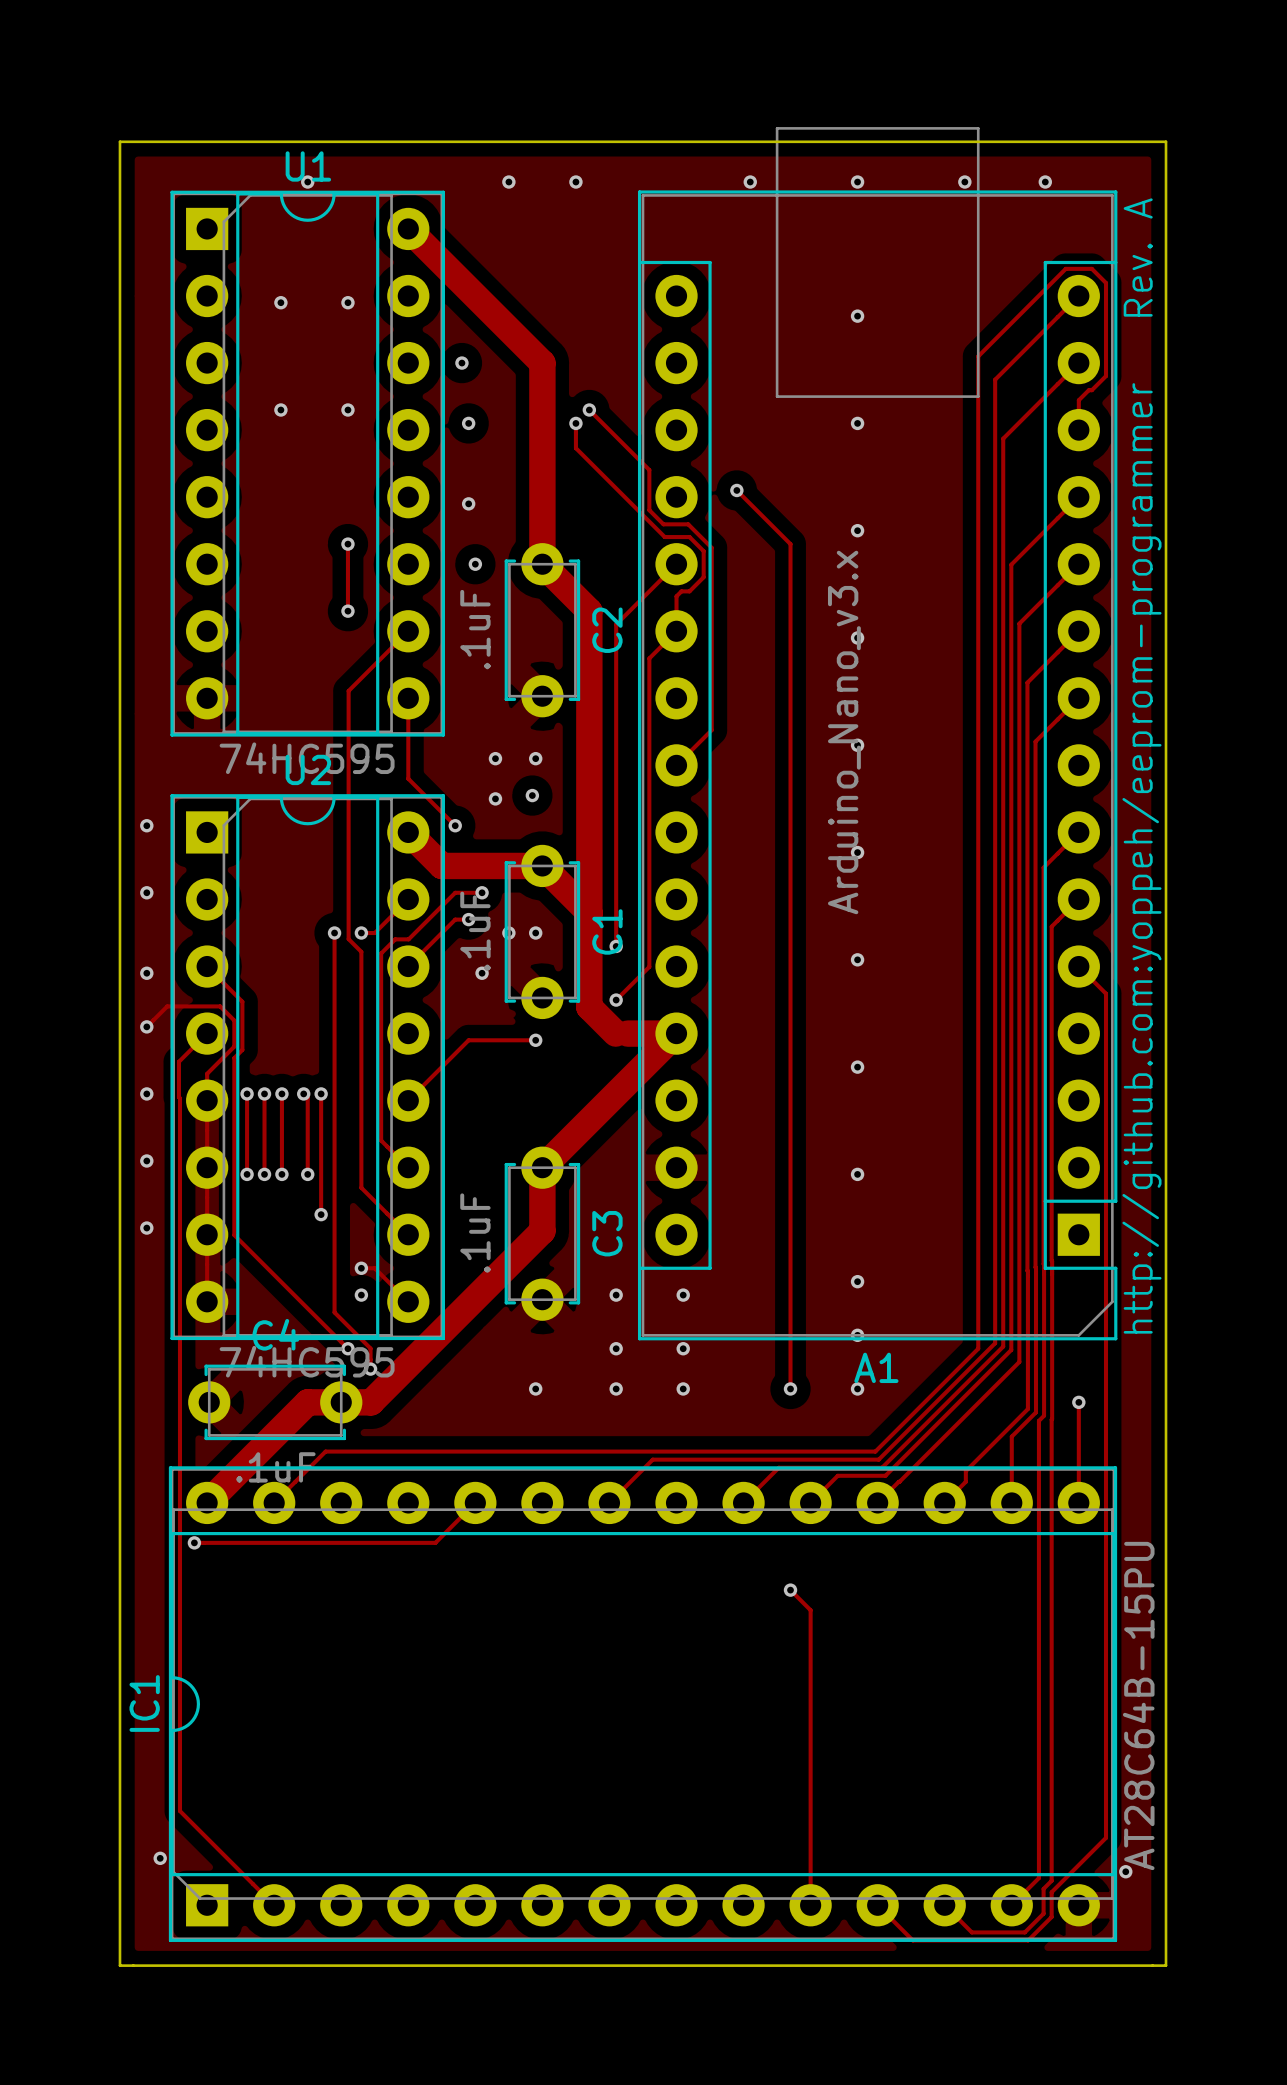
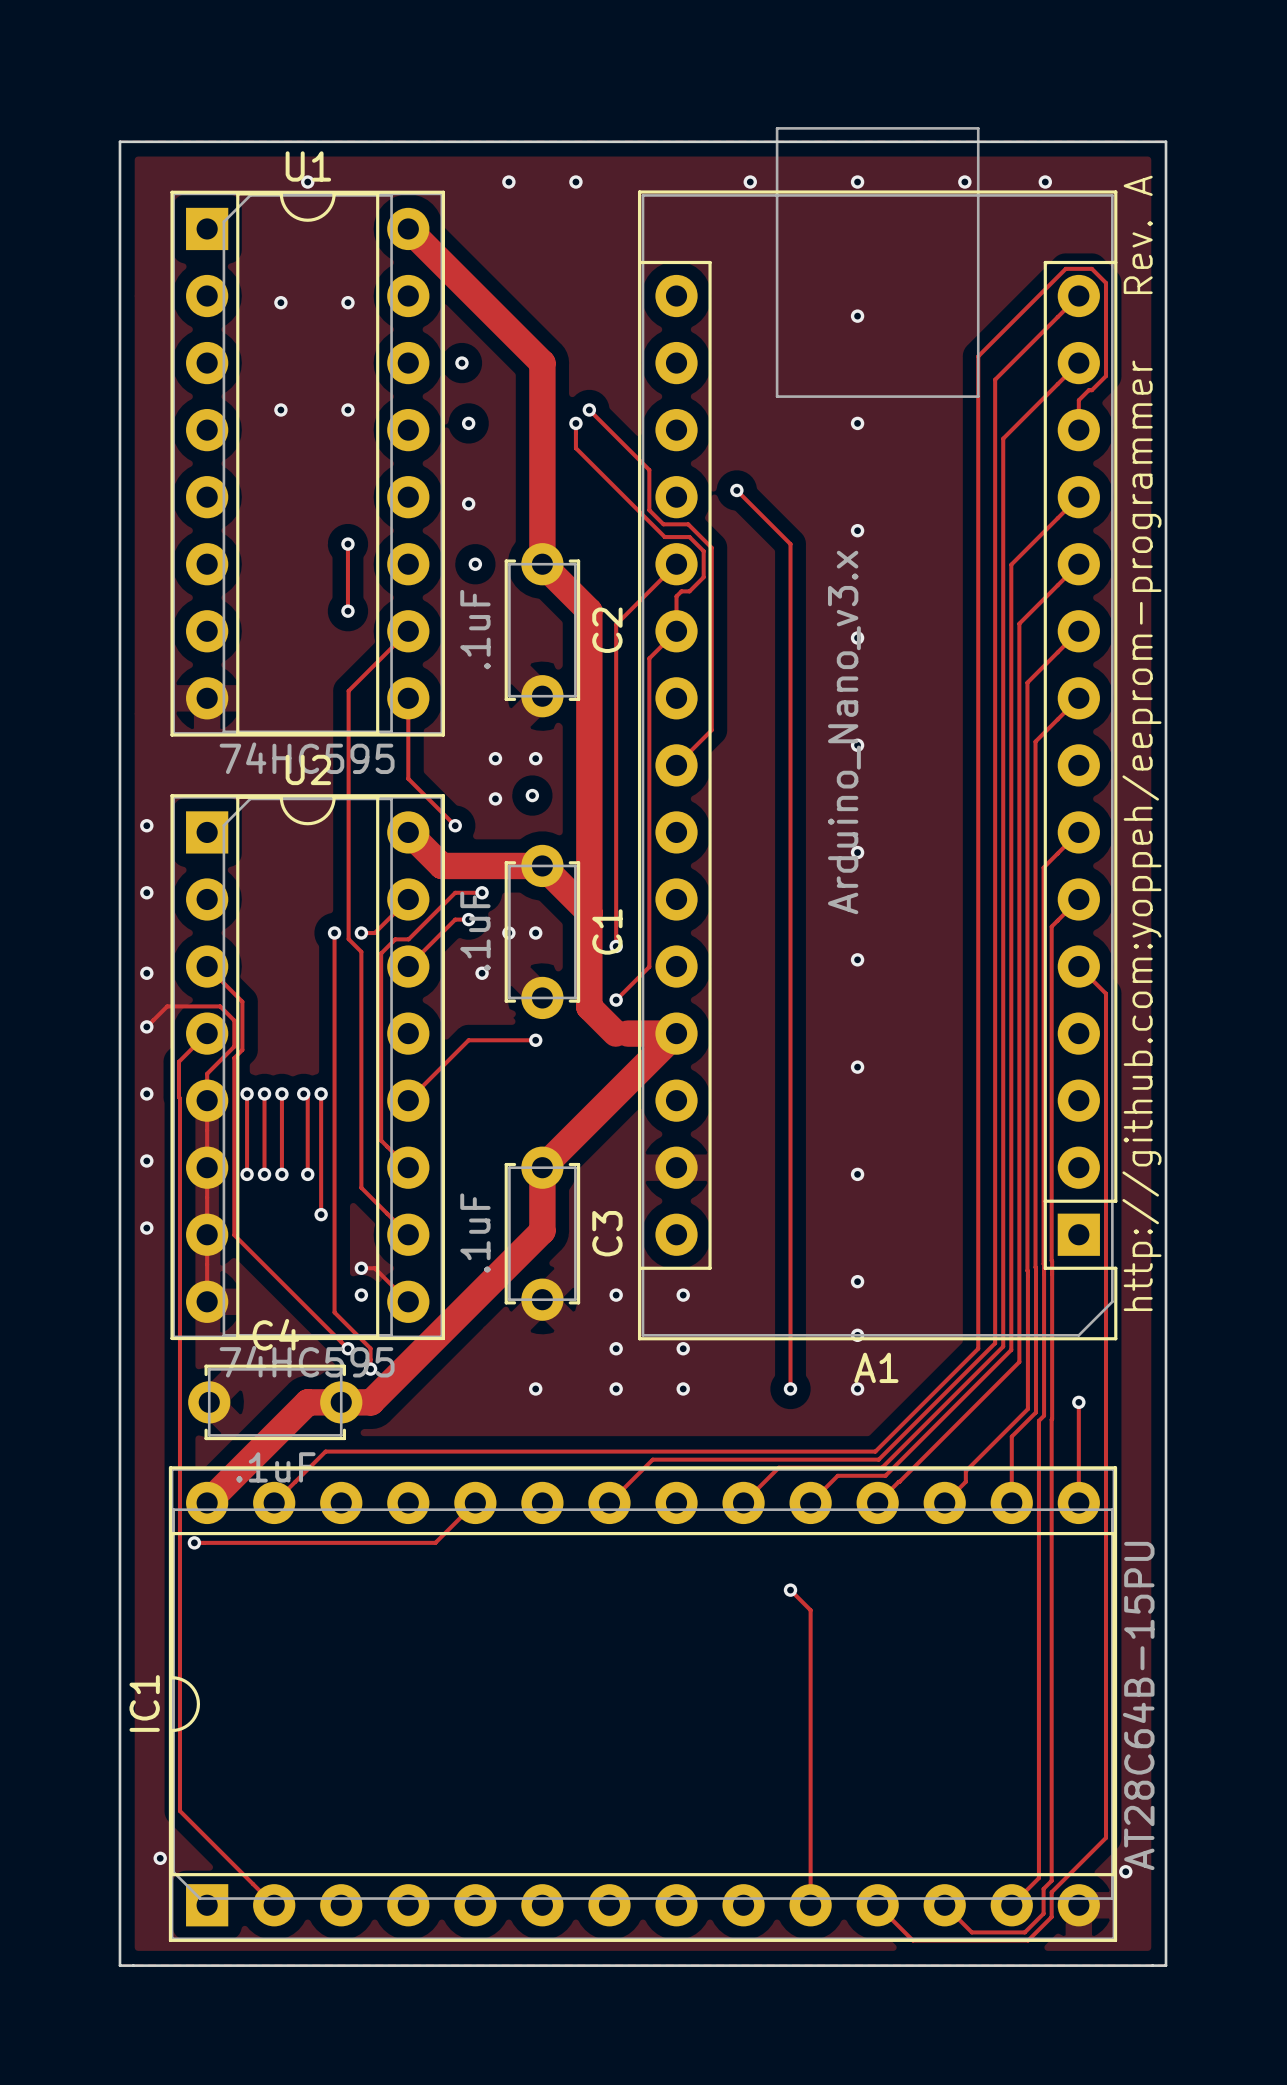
text position: http://github.com:yoppeh/eeprom-programmer Rev. A (1141, 766) -> http://github.com:yoppeh/eeprom-programmer Rev. A (1141, 743)

